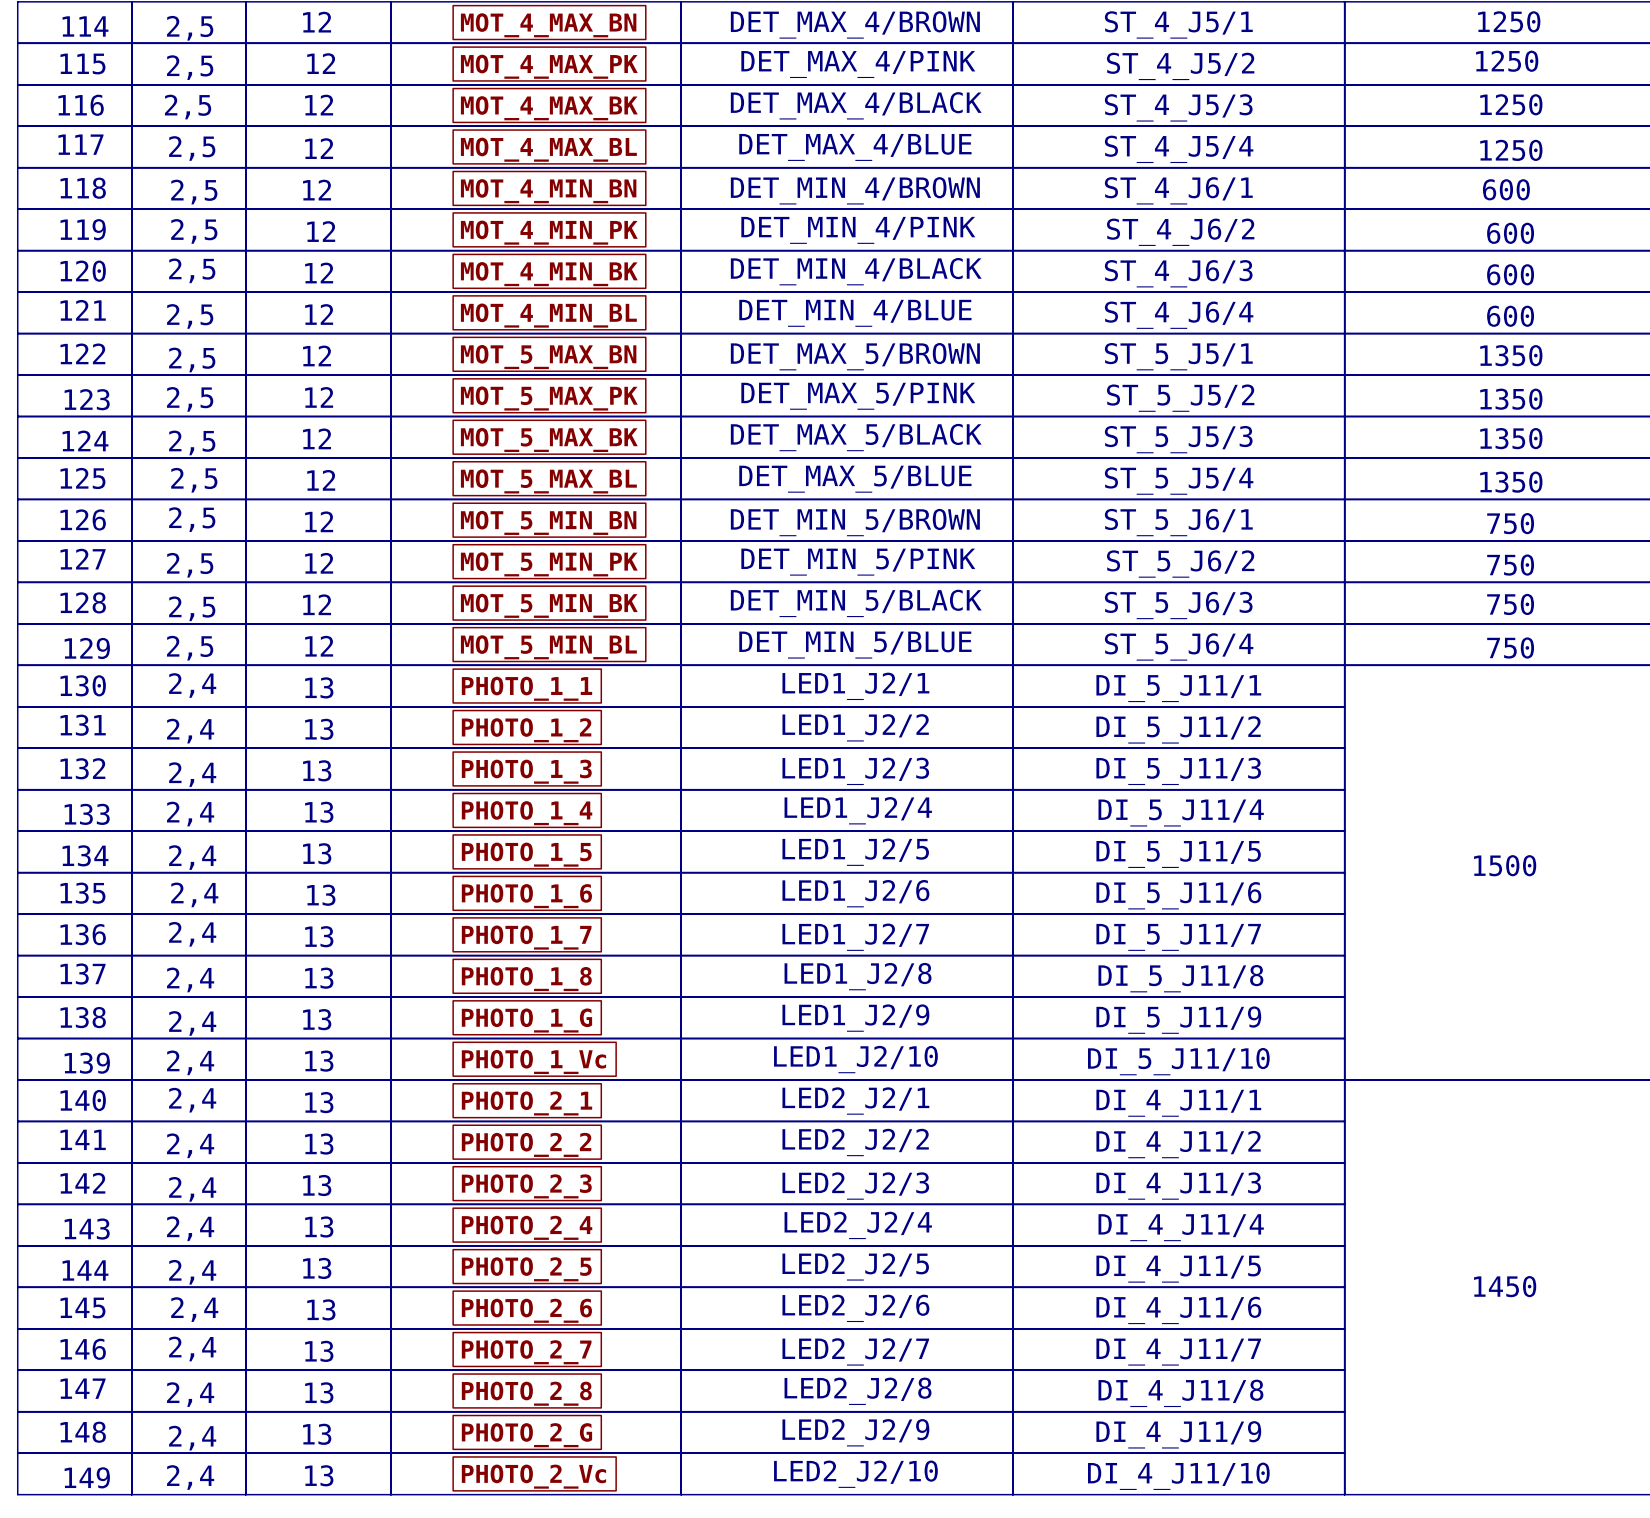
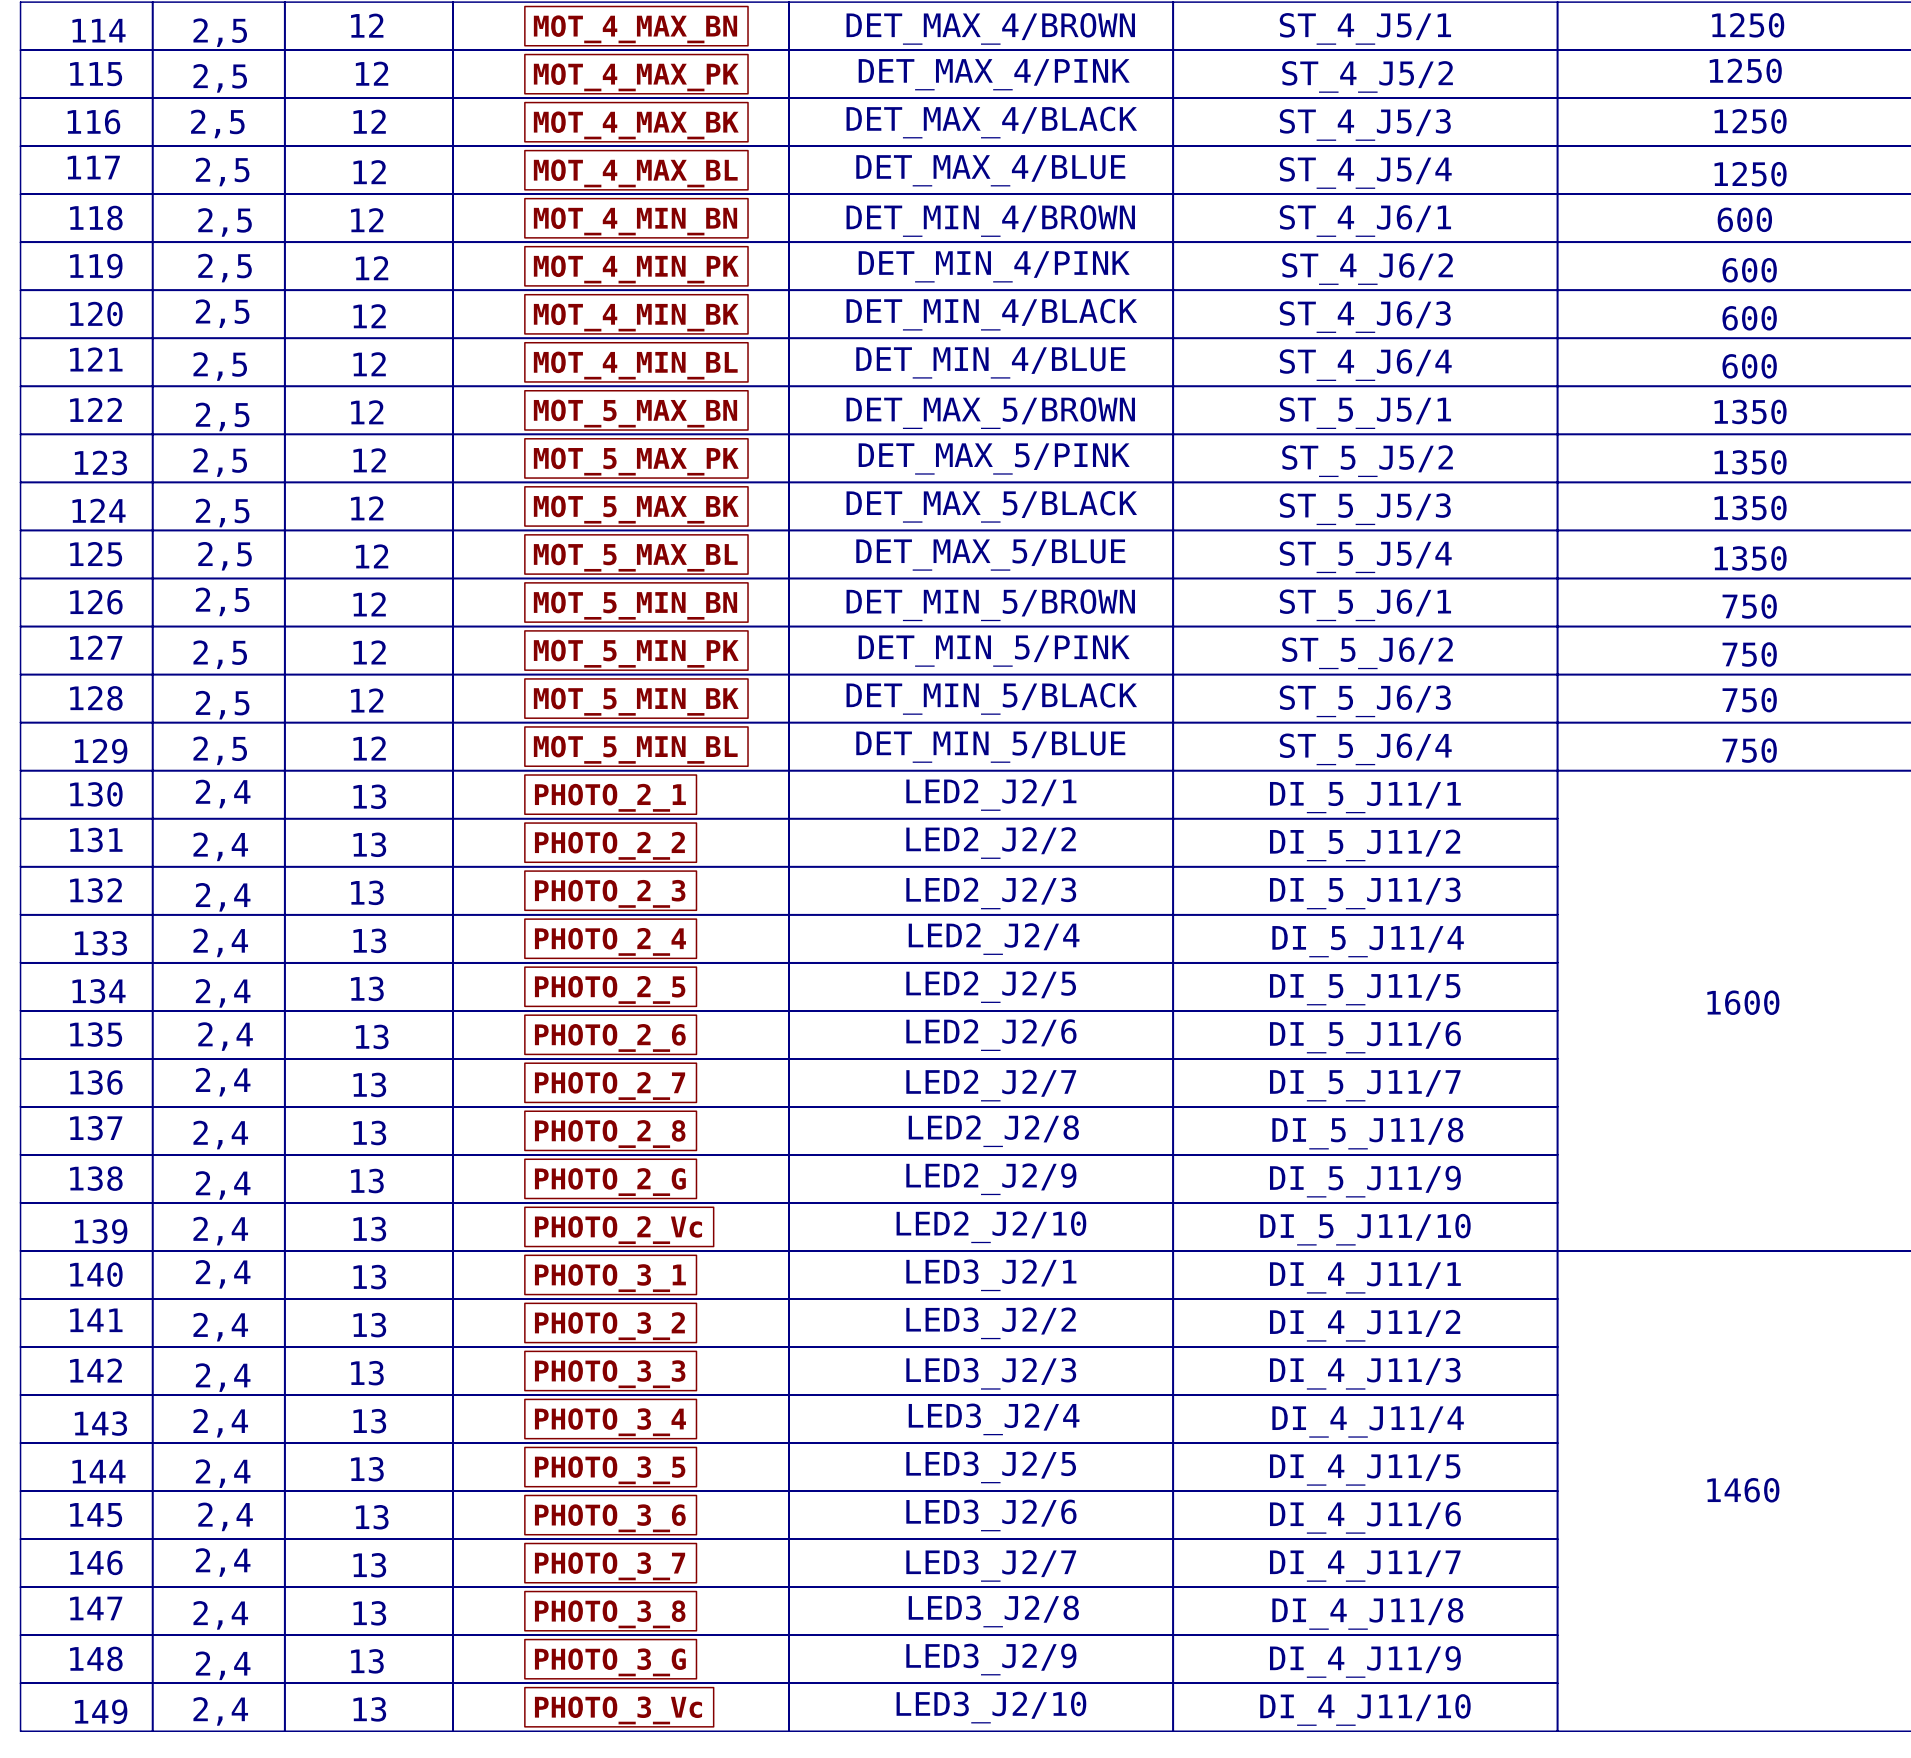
text: LED1_J2/1 (855, 686) -> LED2_J2/1 (991, 794)
global label: PHOTO_1_1 (526, 688) -> PHOTO_2_1 (610, 797)
text: LED1_J2/2 (855, 727) -> LED2_J2/2 (991, 843)
global label: PHOTO_1_2 (526, 730) -> PHOTO_2_2 (609, 845)
global label: PHOTO_1_3 (526, 771) -> PHOTO_2_3 (610, 893)
text: LED1_J2/3 (855, 771) -> LED2_J2/3 (991, 893)
text: LED1_J2/4 (858, 810) -> LED2_J2/4 (994, 939)
global label: PHOTO_1_4 (527, 813) -> PHOTO_2_4 (610, 941)
text: LED1_J2/5 (855, 852) -> LED2_J2/5 (991, 987)
global label: PHOTO_1_5 (526, 854) -> PHOTO_2_5 (610, 989)
text: 1500 (1505, 865) -> 1600 (1743, 1002)
text: LED1_J2/6 (855, 893) -> LED2_J2/6 (991, 1035)
global label: PHOTO_1_6 (526, 896) -> PHOTO_2_6 (610, 1037)
global label: PHOTO_1_7 (526, 937) -> PHOTO_2_7 (610, 1085)
text: LED1_J2/7 (855, 937) -> LED2_J2/7 (991, 1085)
text: LED1_J2/8 (858, 976) -> LED2_J2/8 (993, 1131)
global label: PHOTO_1_8 (526, 979) -> PHOTO_2_8 (610, 1134)
text: LED1_J2/9 (855, 1018) -> LED2_J2/9 (991, 1179)
global label: PHOTO_1_G (526, 1020) -> PHOTO_2_G (610, 1182)
text: LED1_J2/10 (855, 1059) -> LED2_J2/10 (991, 1227)
global label: PHOTO_1_Vc (533, 1061) -> PHOTO_2_Vc (618, 1230)
text: LED2_J2/1 (855, 1101) -> LED3_J2/1 (991, 1275)
global label: PHOTO_2_1 (526, 1103) -> PHOTO_3_1 (610, 1278)
text: LED2_J2/2 (855, 1142) -> LED3_J2/2 (991, 1323)
global label: PHOTO_2_2 (526, 1144) -> PHOTO_3_2 (609, 1326)
global label: PHOTO_2_3 (526, 1186) -> PHOTO_3_3 (610, 1374)
text: LED2_J2/3 (855, 1186) -> LED3_J2/3 (991, 1373)
text: LED2_J2/4 (858, 1225) -> LED3_J2/4 (994, 1419)
global label: PHOTO_2_4 (527, 1227) -> PHOTO_3_4 (610, 1422)
text: LED2_J2/5 (855, 1266) -> LED3_J2/5 (991, 1467)
global label: PHOTO_2_5 (526, 1269) -> PHOTO_3_5 (610, 1470)
text: 1450 (1505, 1286) -> 1460 (1743, 1490)
text: LED2_J2/6 (855, 1308) -> LED3_J2/6 (991, 1515)
global label: PHOTO_2_6 (526, 1310) -> PHOTO_3_6 (610, 1518)
text: LED2_J2/7 (855, 1351) -> LED3_J2/7 (991, 1565)
global label: PHOTO_2_7 (526, 1352) -> PHOTO_3_7 (610, 1566)
text: LED2_J2/8 (858, 1391) -> LED3_J2/8 (993, 1611)
global label: PHOTO_2_8 (526, 1393) -> PHOTO_3_8 (610, 1614)
text: LED2_J2/9 (855, 1432) -> LED3_J2/9 (991, 1659)
global label: PHOTO_2_G (526, 1435) -> PHOTO_3_G (610, 1662)
text: LED2_J2/10 (855, 1474) -> LED3_J2/10 (991, 1707)
global label: PHOTO_2_Vc (533, 1476) -> PHOTO_3_Vc (618, 1710)

